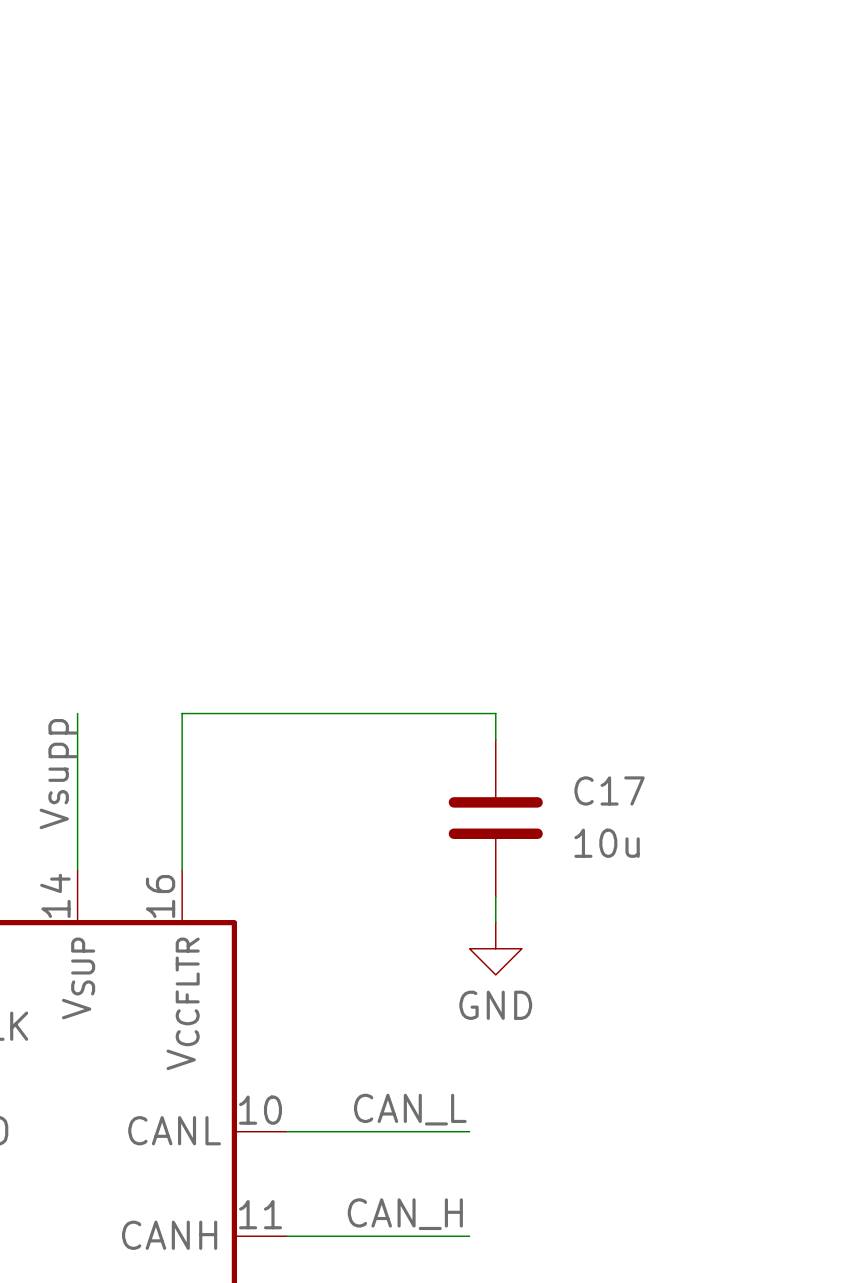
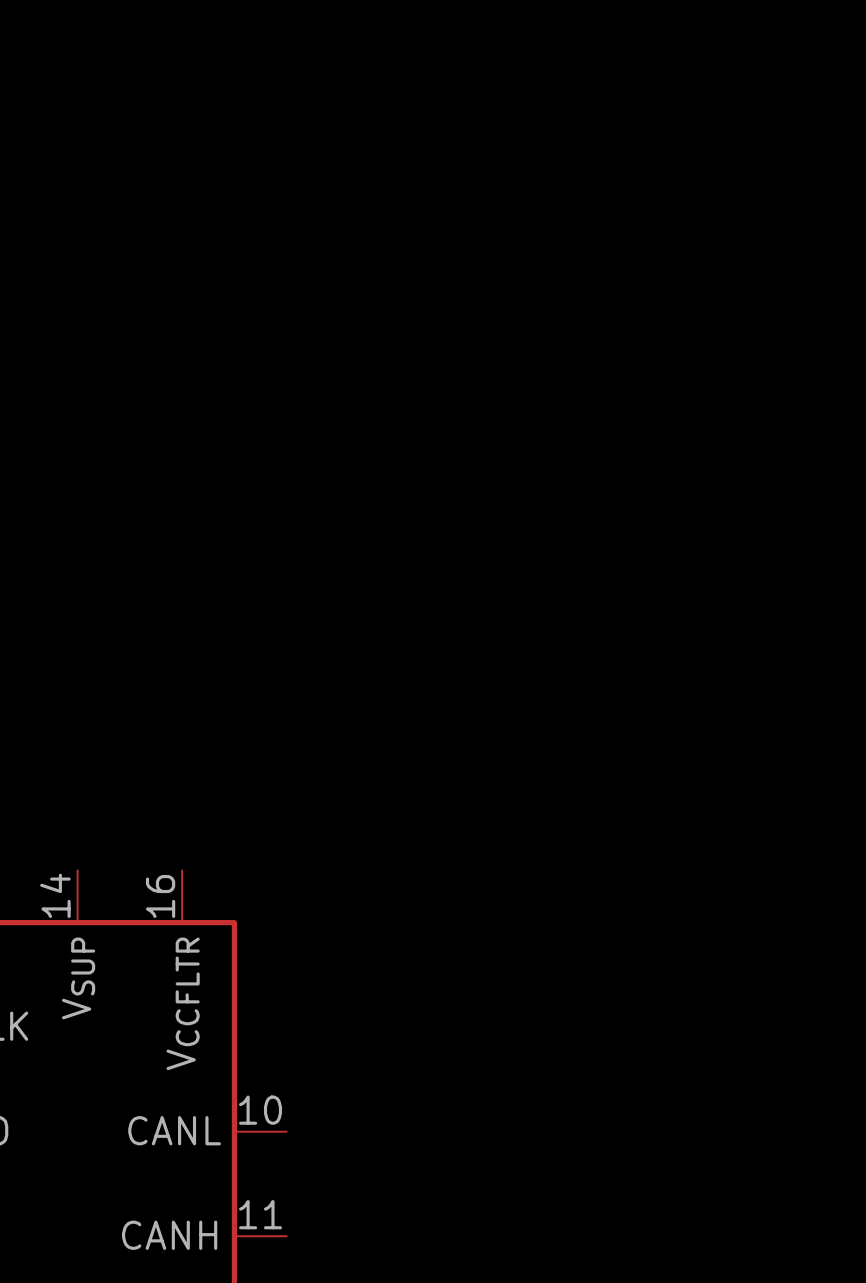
wire: (77, 713) (77, 870) -> none
wire: (495, 739) (495, 713) (182, 713) (182, 870) -> none
label: Vsupp (58, 774) -> none
C17: 10u (495, 818) -> none
wire: (495, 896) (495, 922) -> none
power symbol: GND (495, 948) -> none
label: CAN_L (410, 1109) -> none
wire: (286, 1131) (469, 1131) -> none
label: CAN_H (405, 1214) -> none
wire: (286, 1236) (469, 1236) -> none

